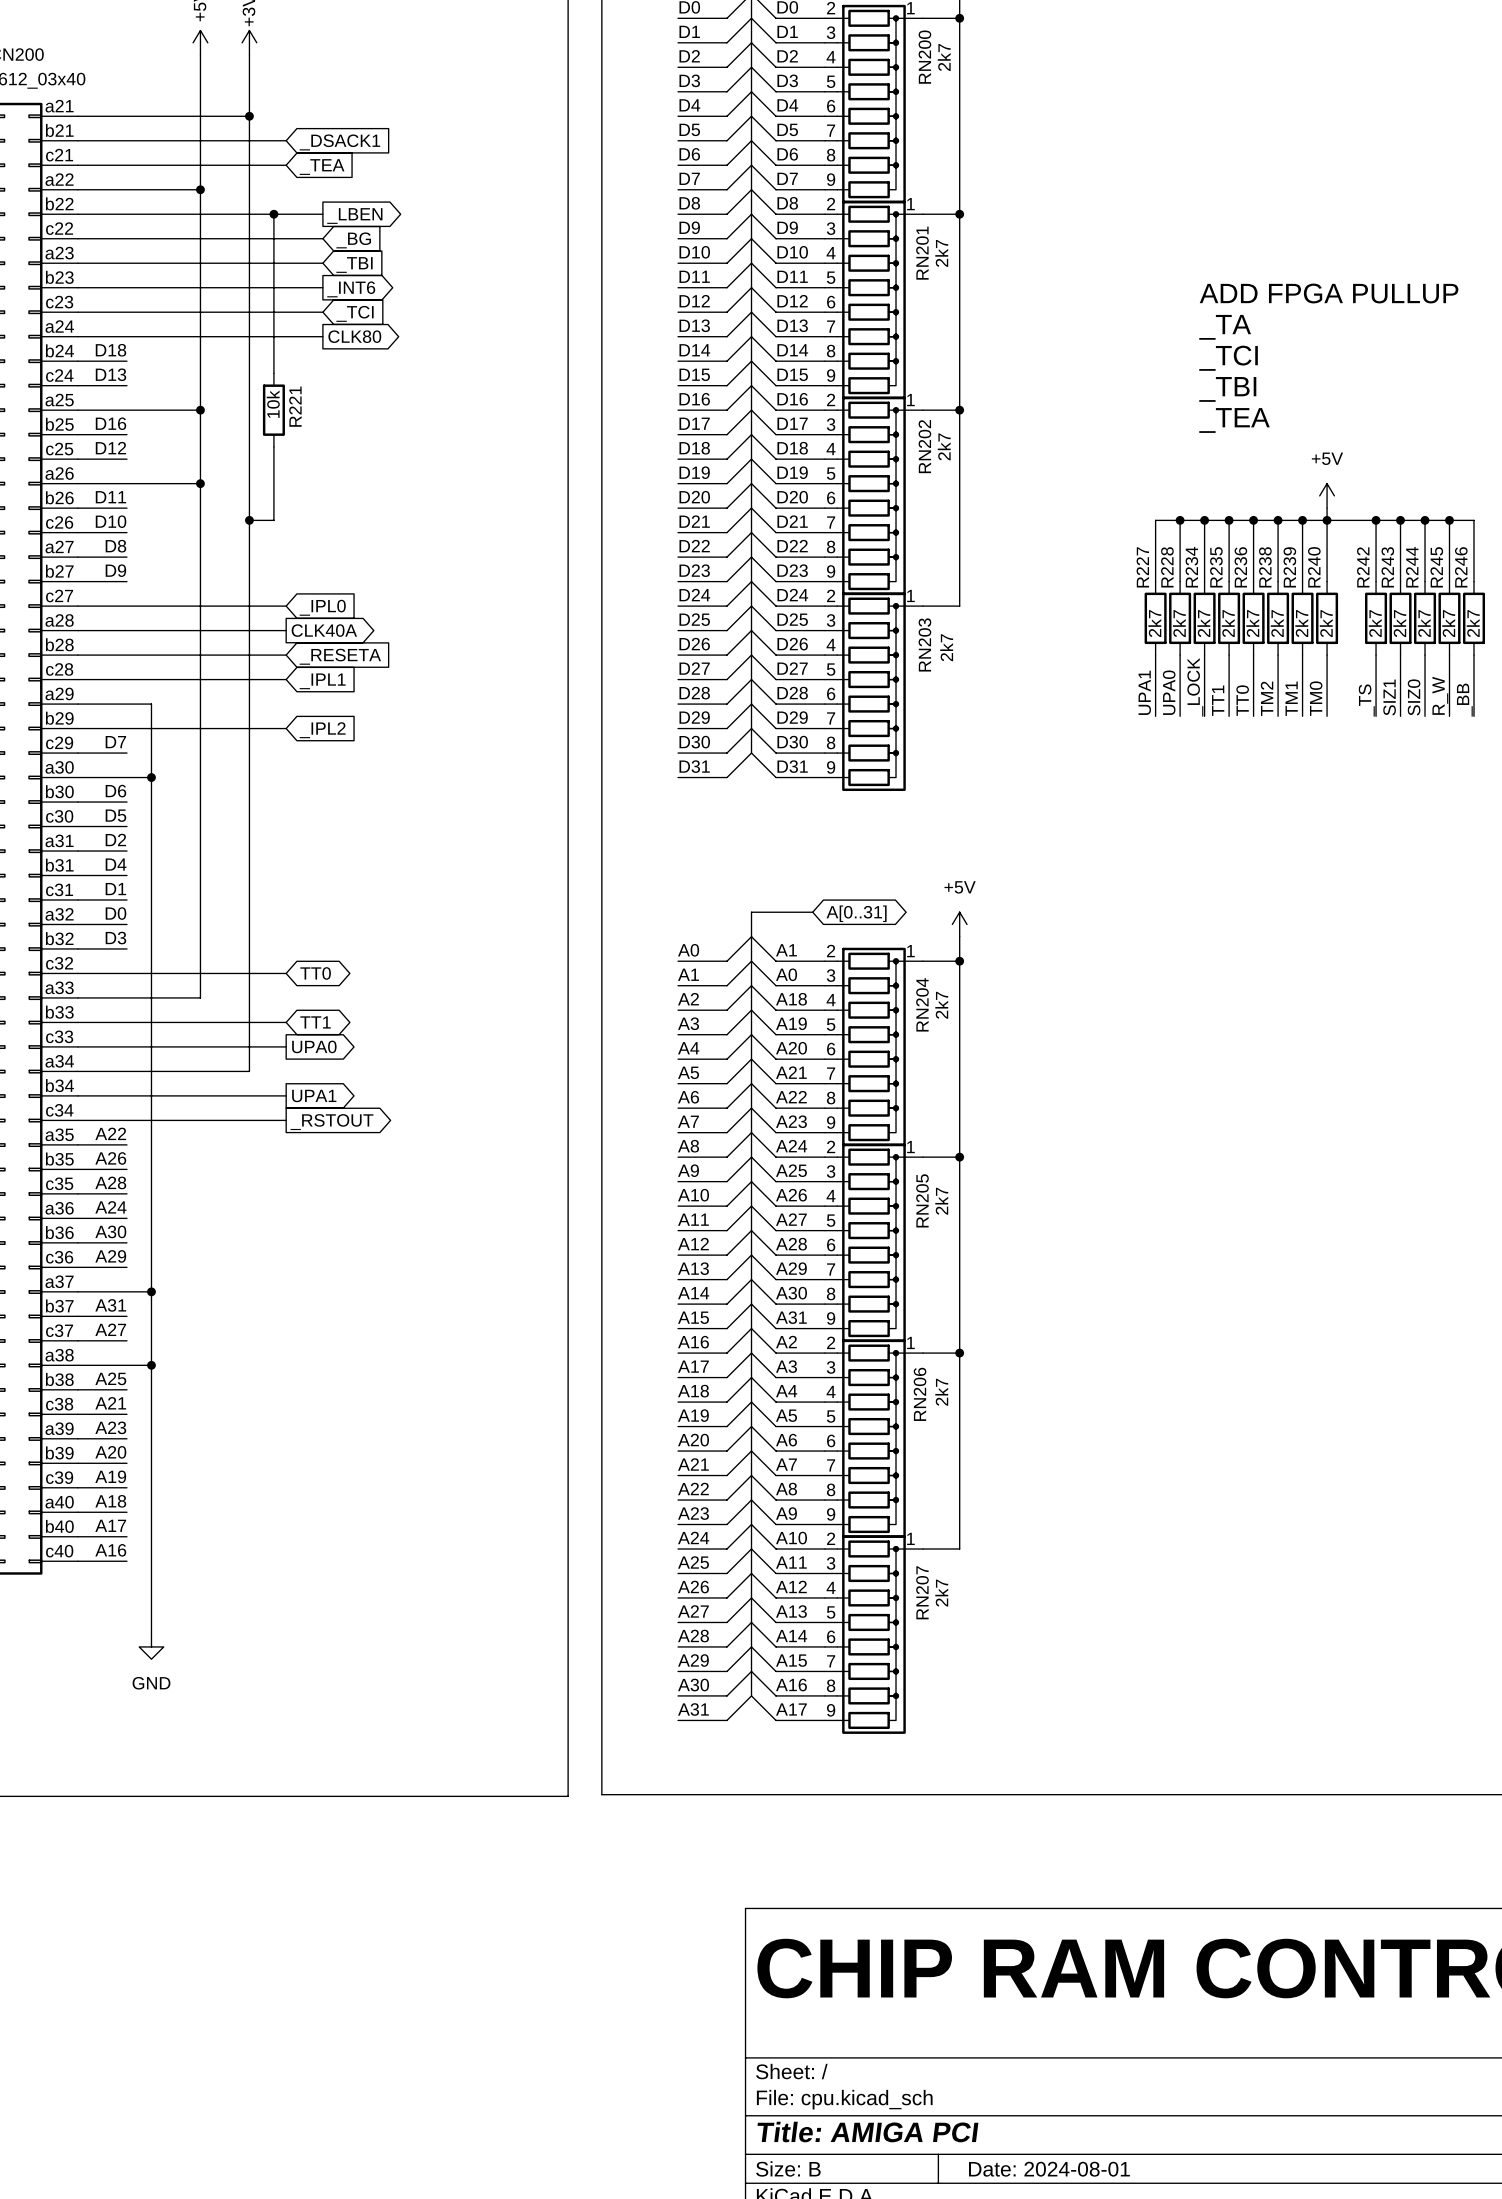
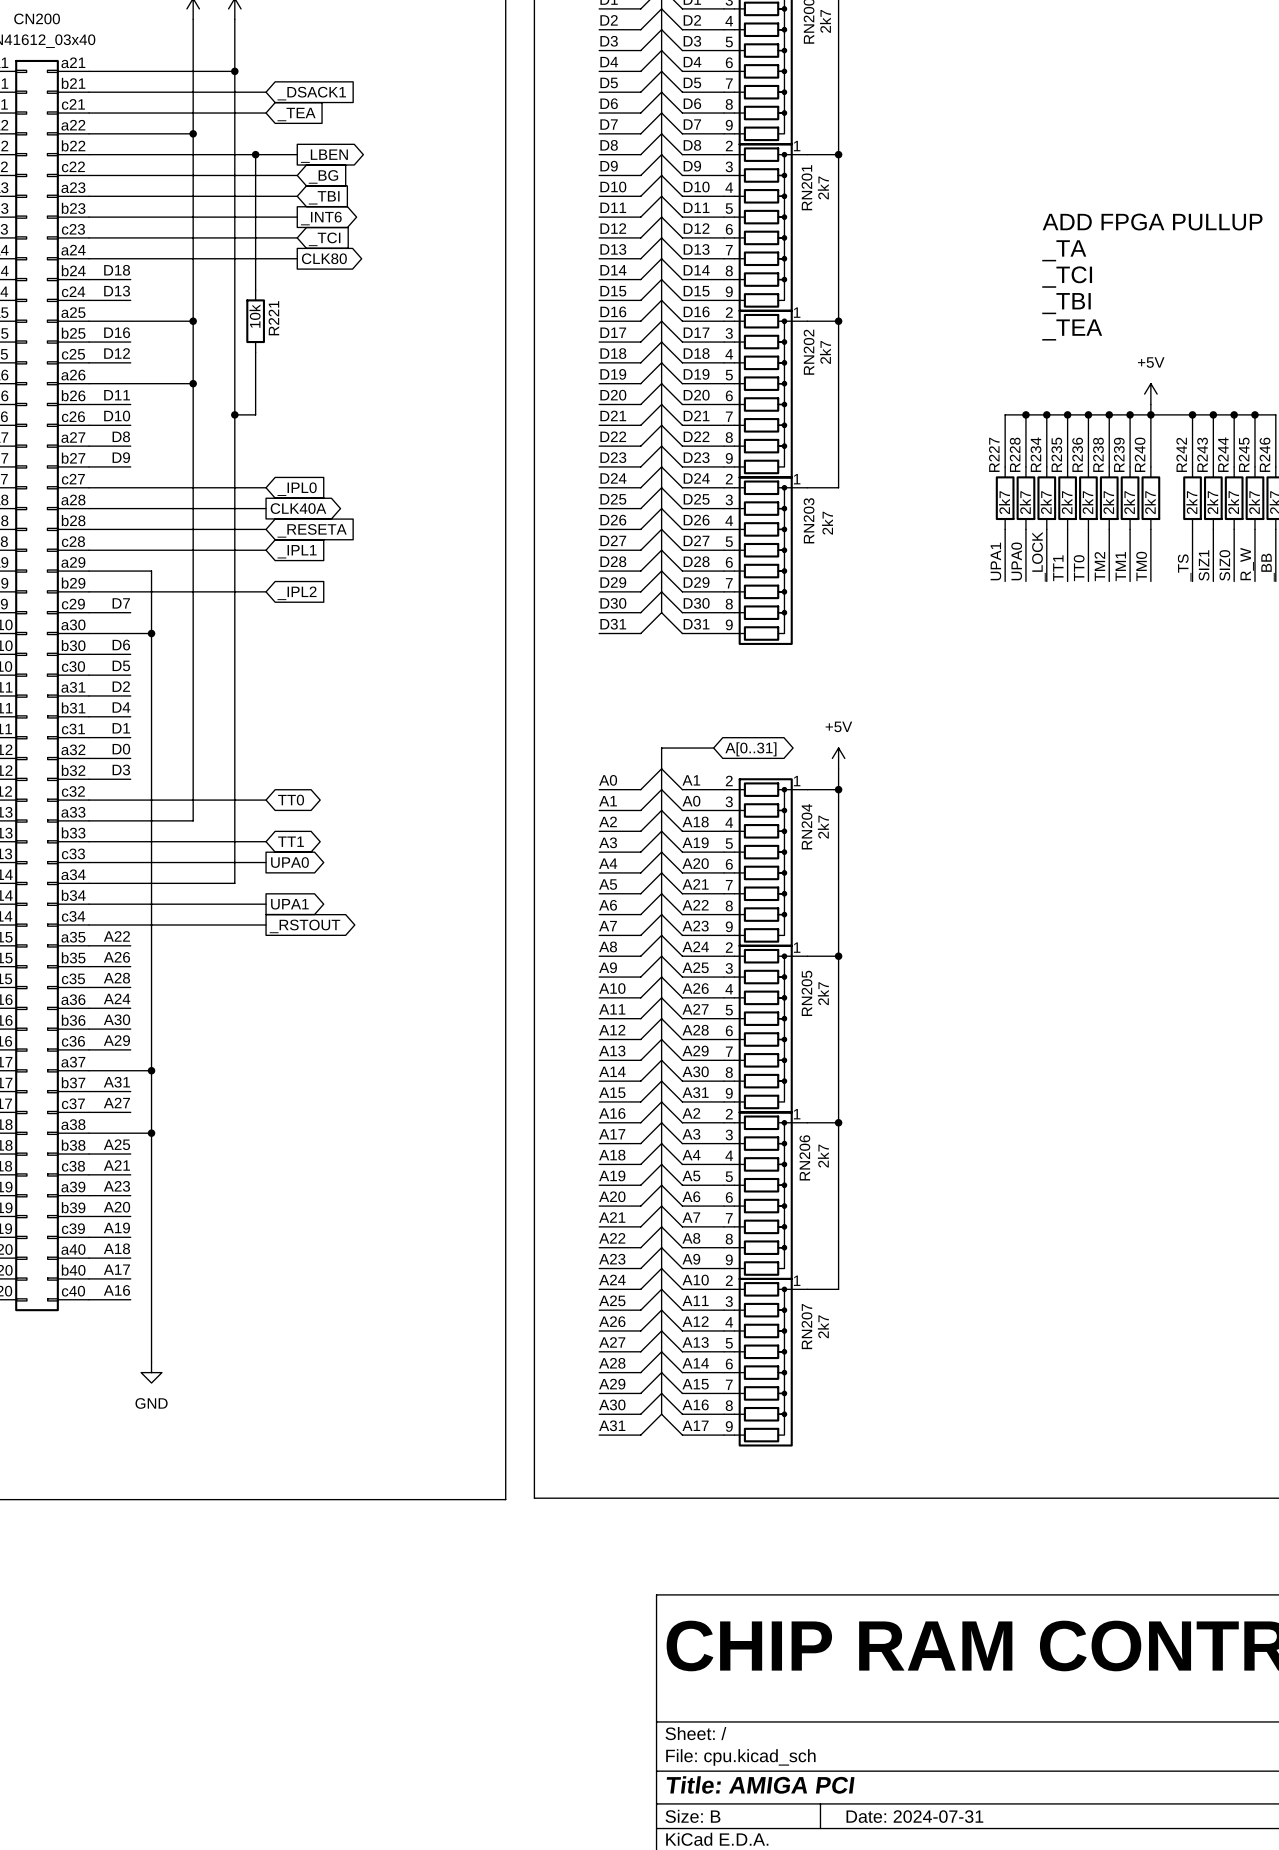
title block: Date: 2024-08-01 (1049, 2169) -> Date: 2024-07-31 (914, 1816)

